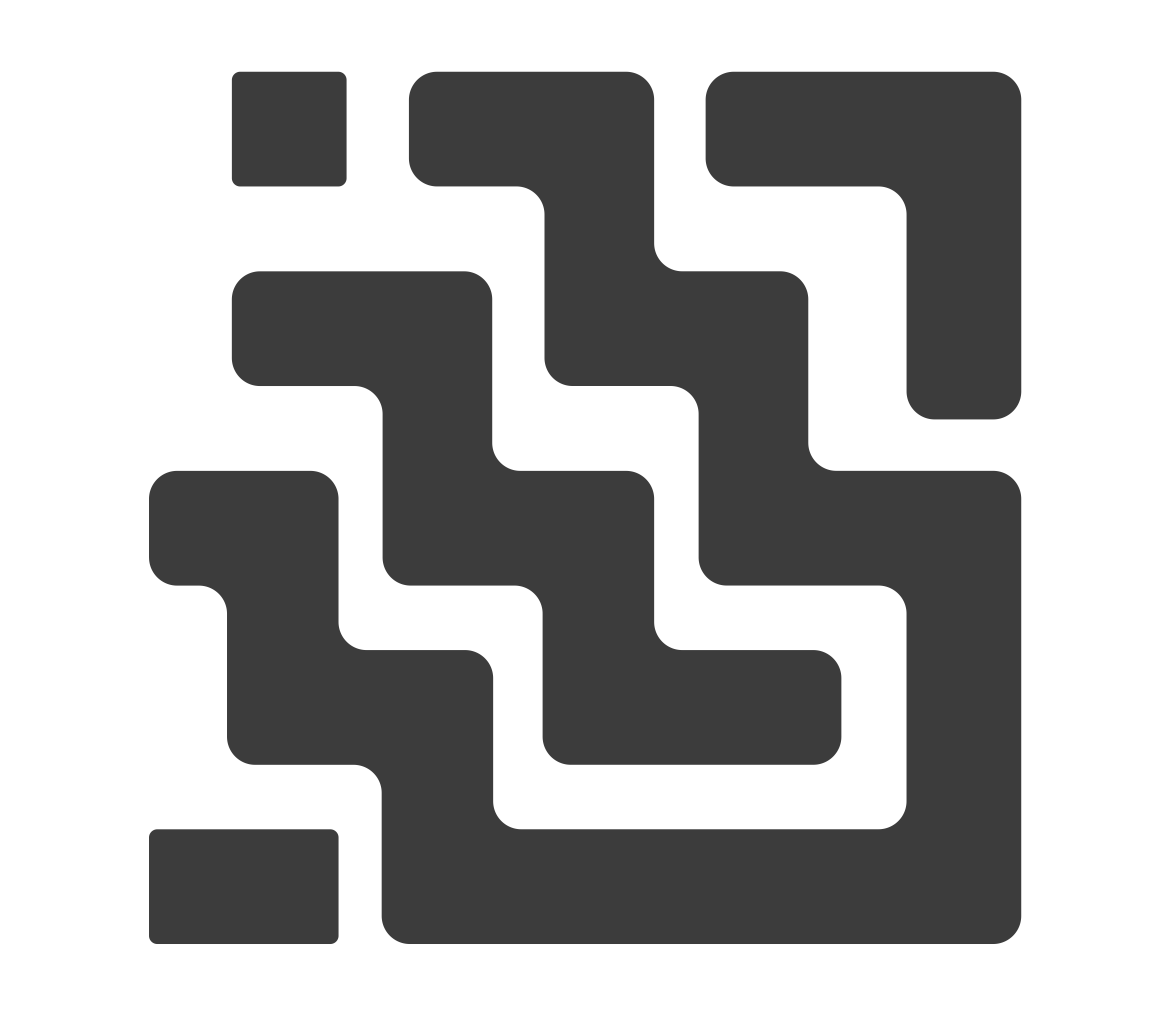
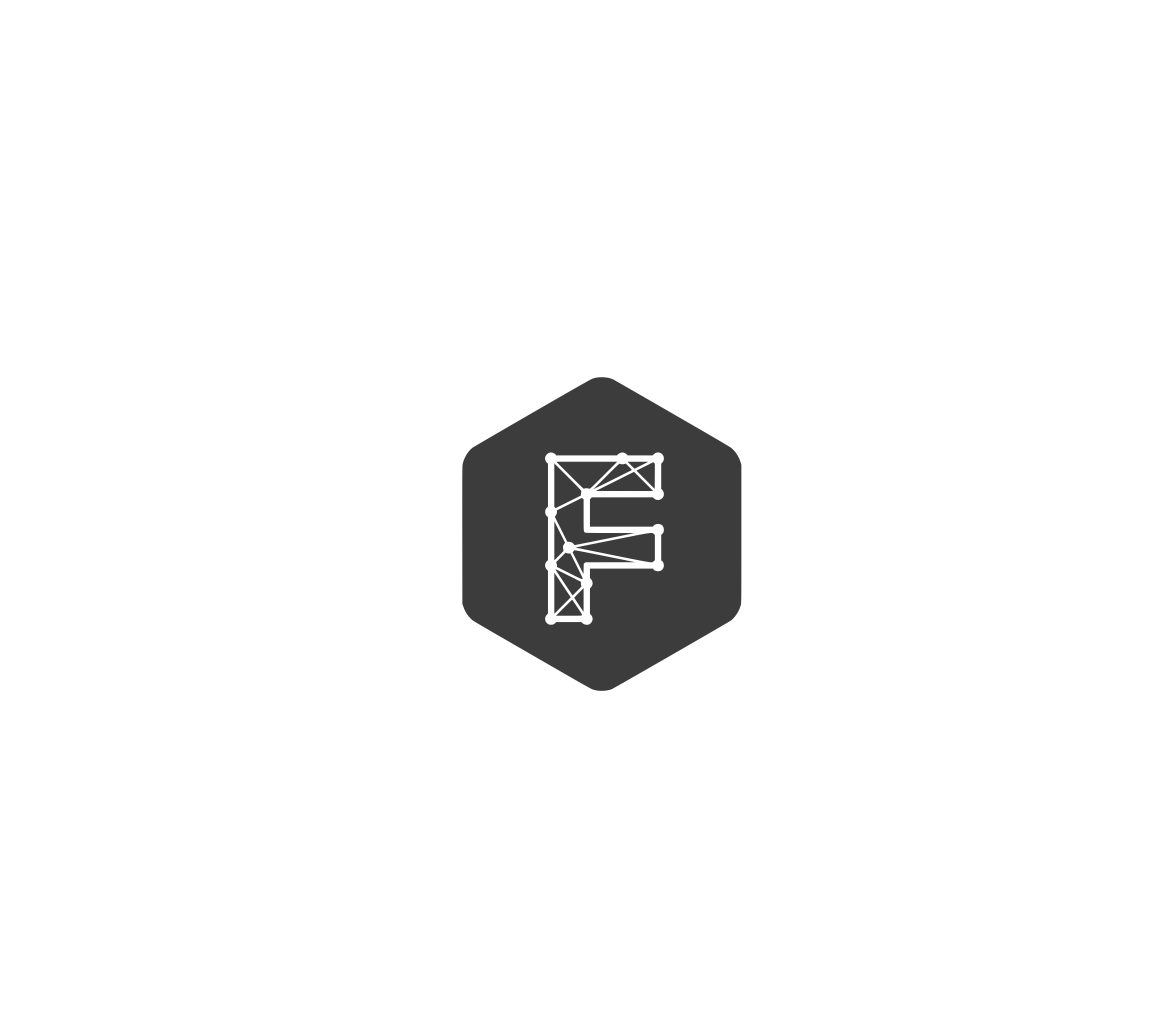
drawing shape: [149, 71, 1022, 945] -> [462, 377, 742, 691]

